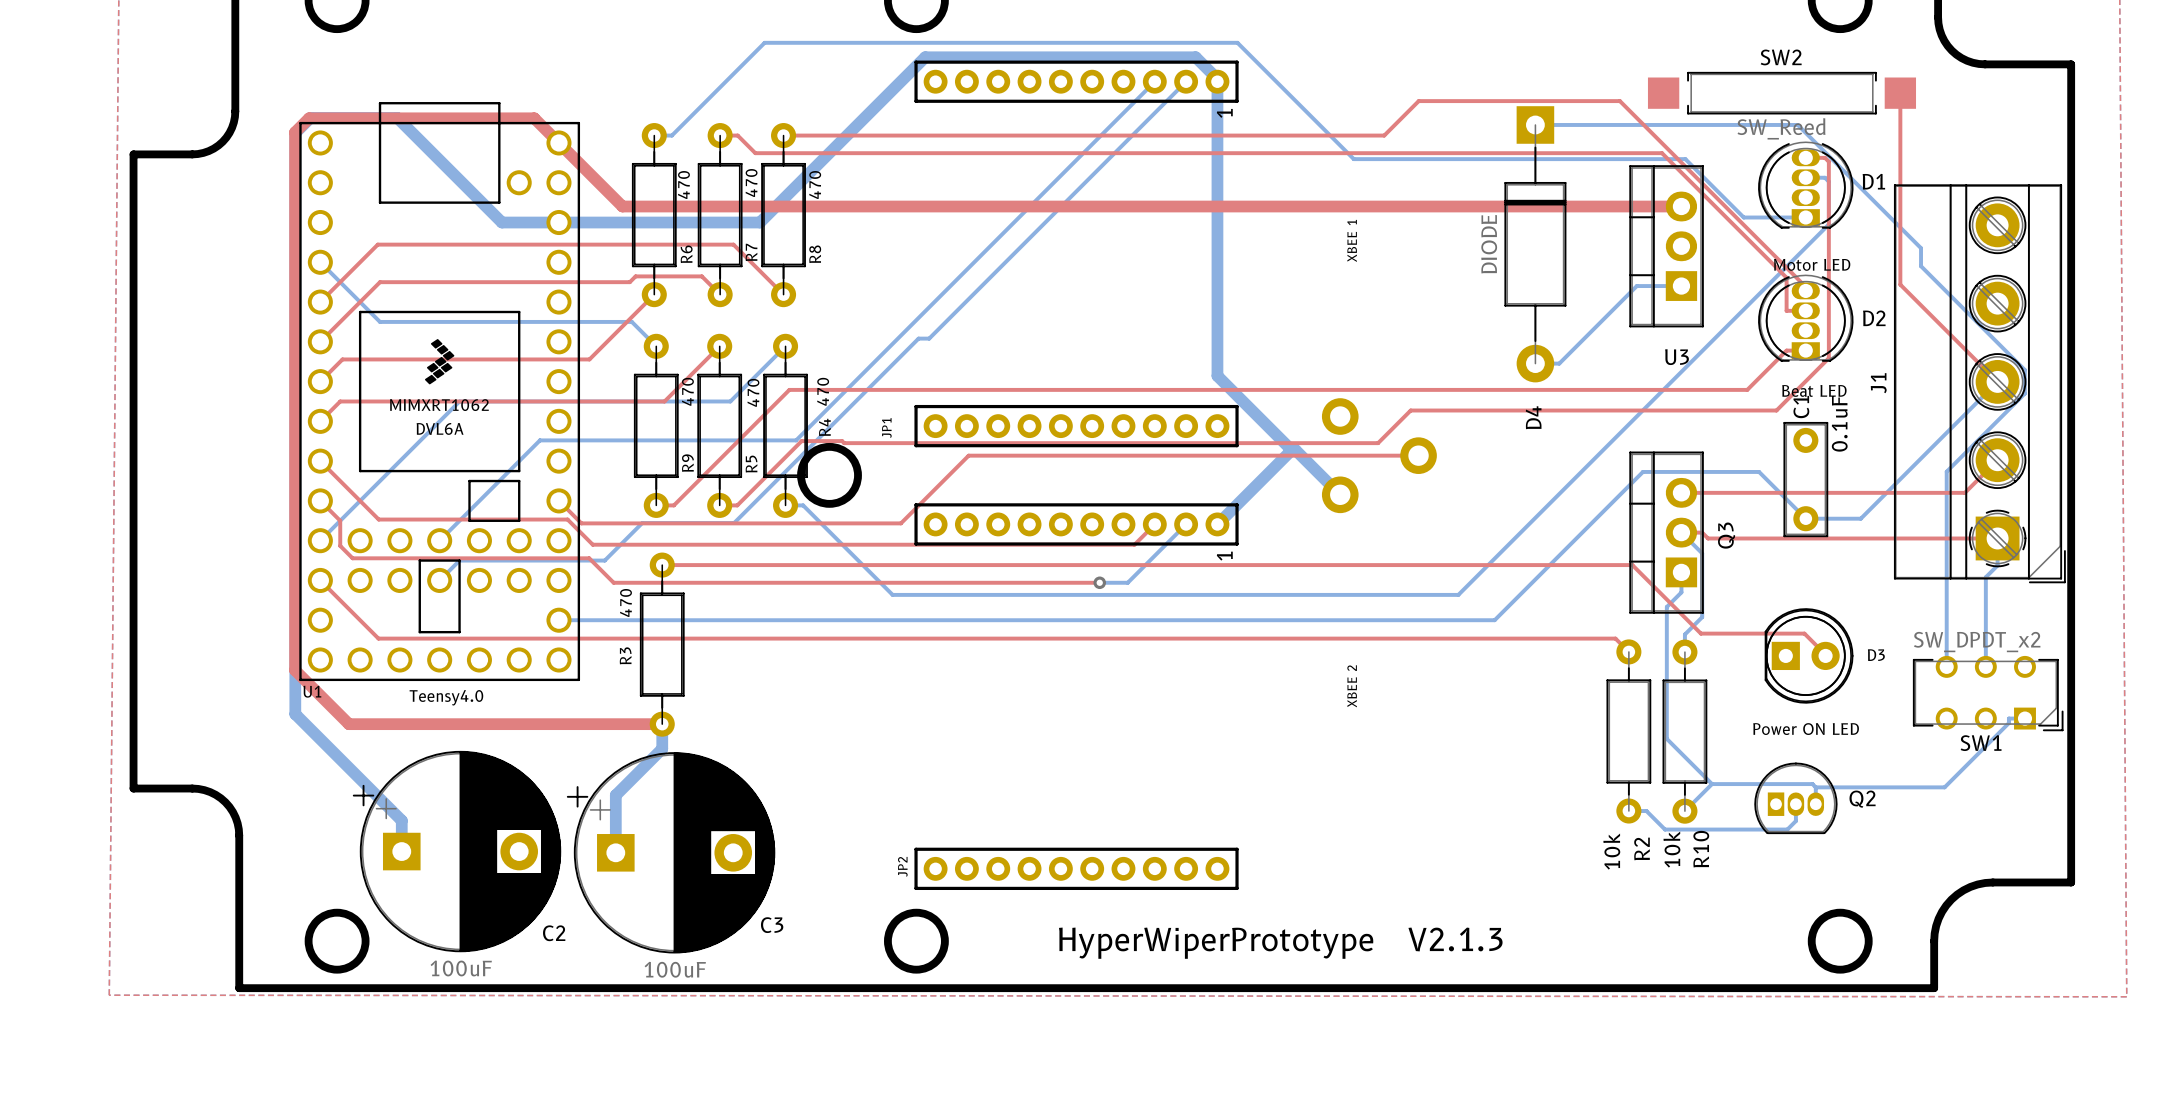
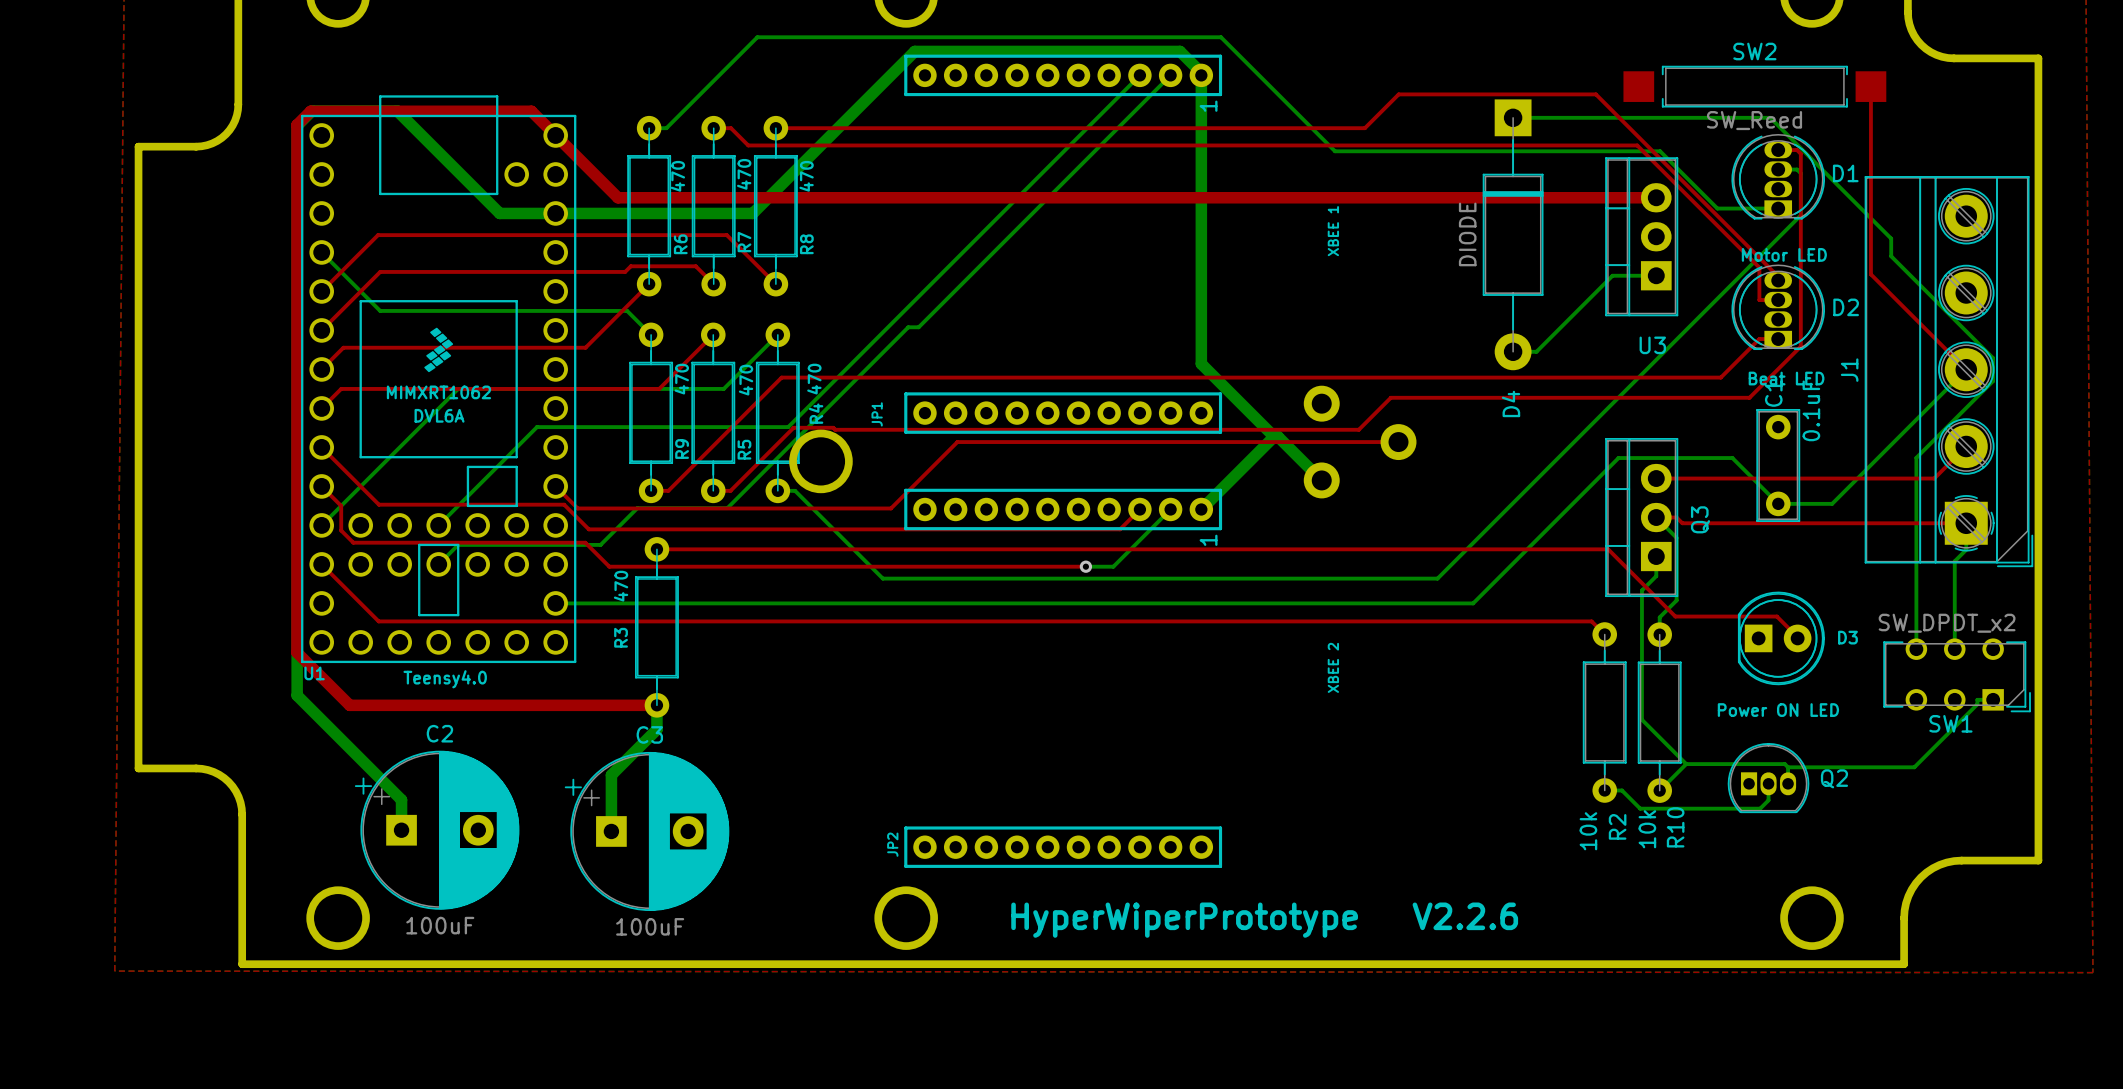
C2 footprint: [352, 750, 562, 953] -> [354, 750, 520, 910]
C3 footprint: [566, 752, 776, 954] -> [564, 751, 730, 911]
C3 name position: C3 (772, 925) -> C3 (649, 734)
C2 name position: C2 (554, 933) -> C2 (439, 733)
text: HyperWiperPrototype V2.1.3 (1280, 943) -> HyperWiperPrototype V2.2.6 (1264, 920)

